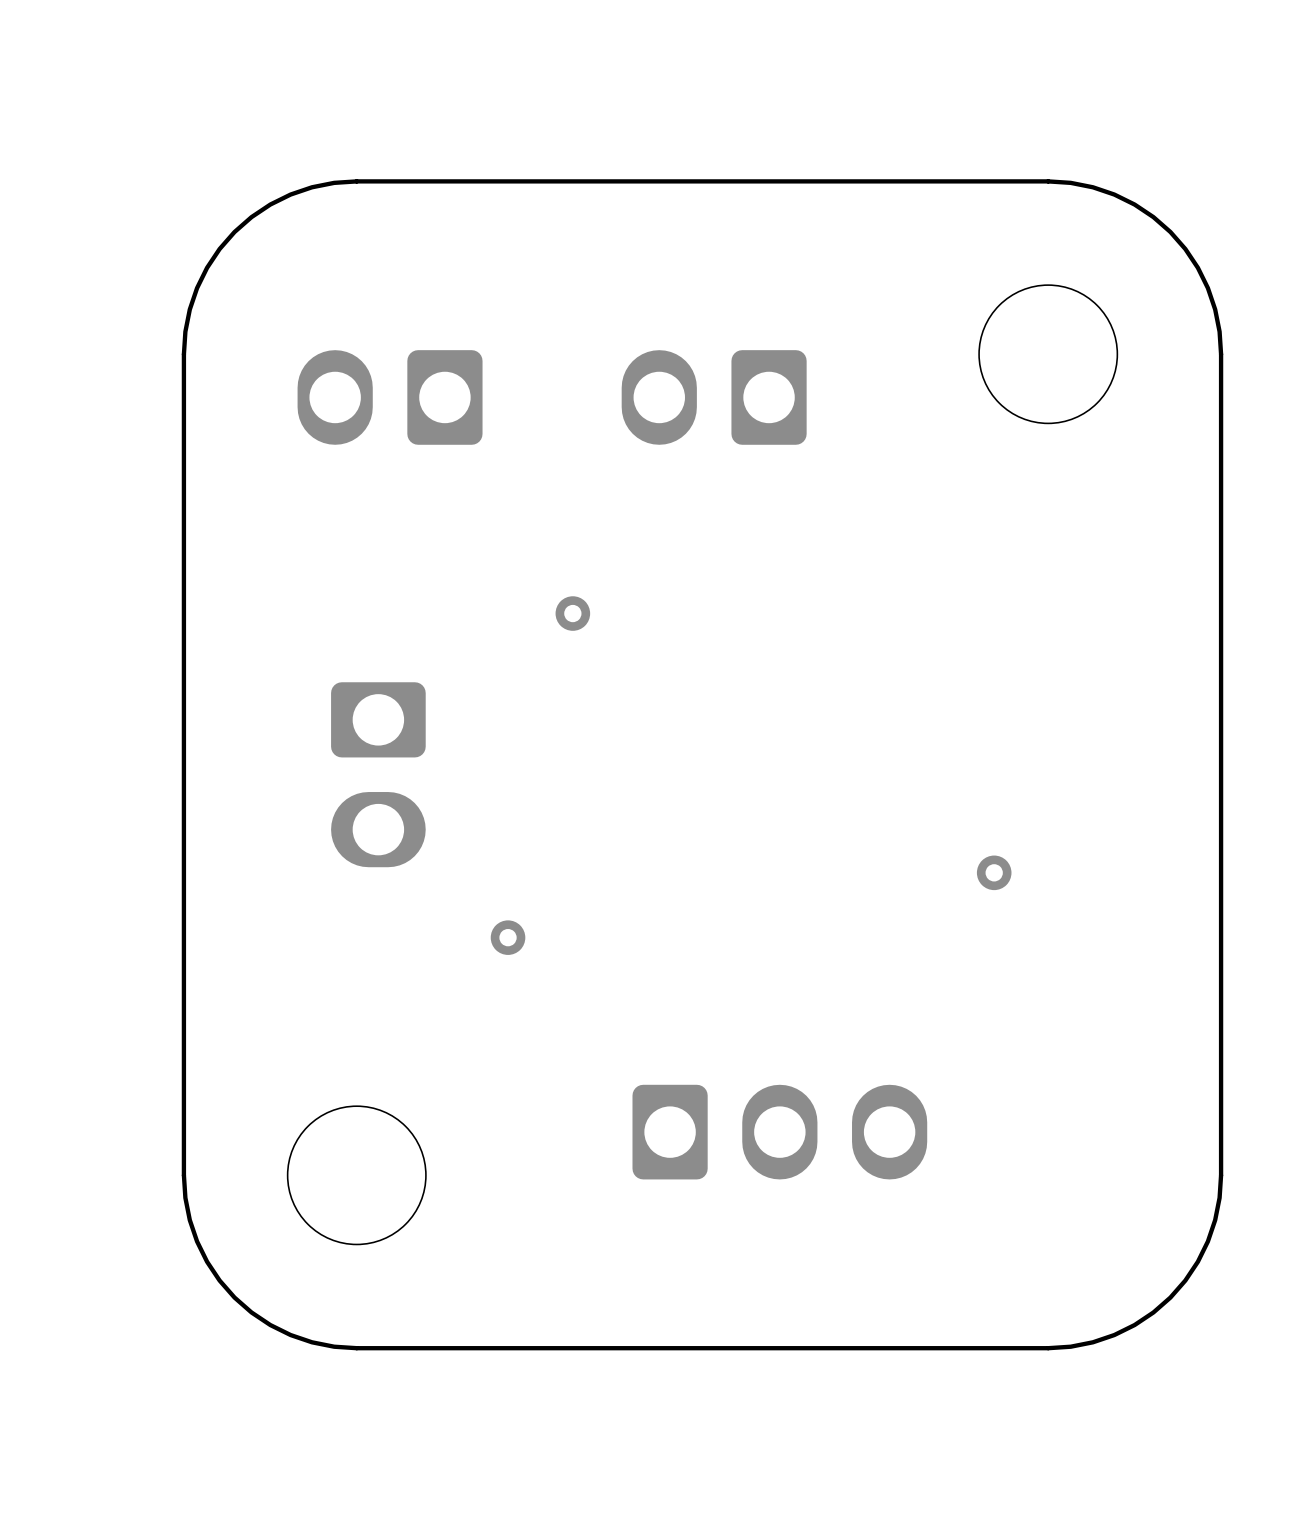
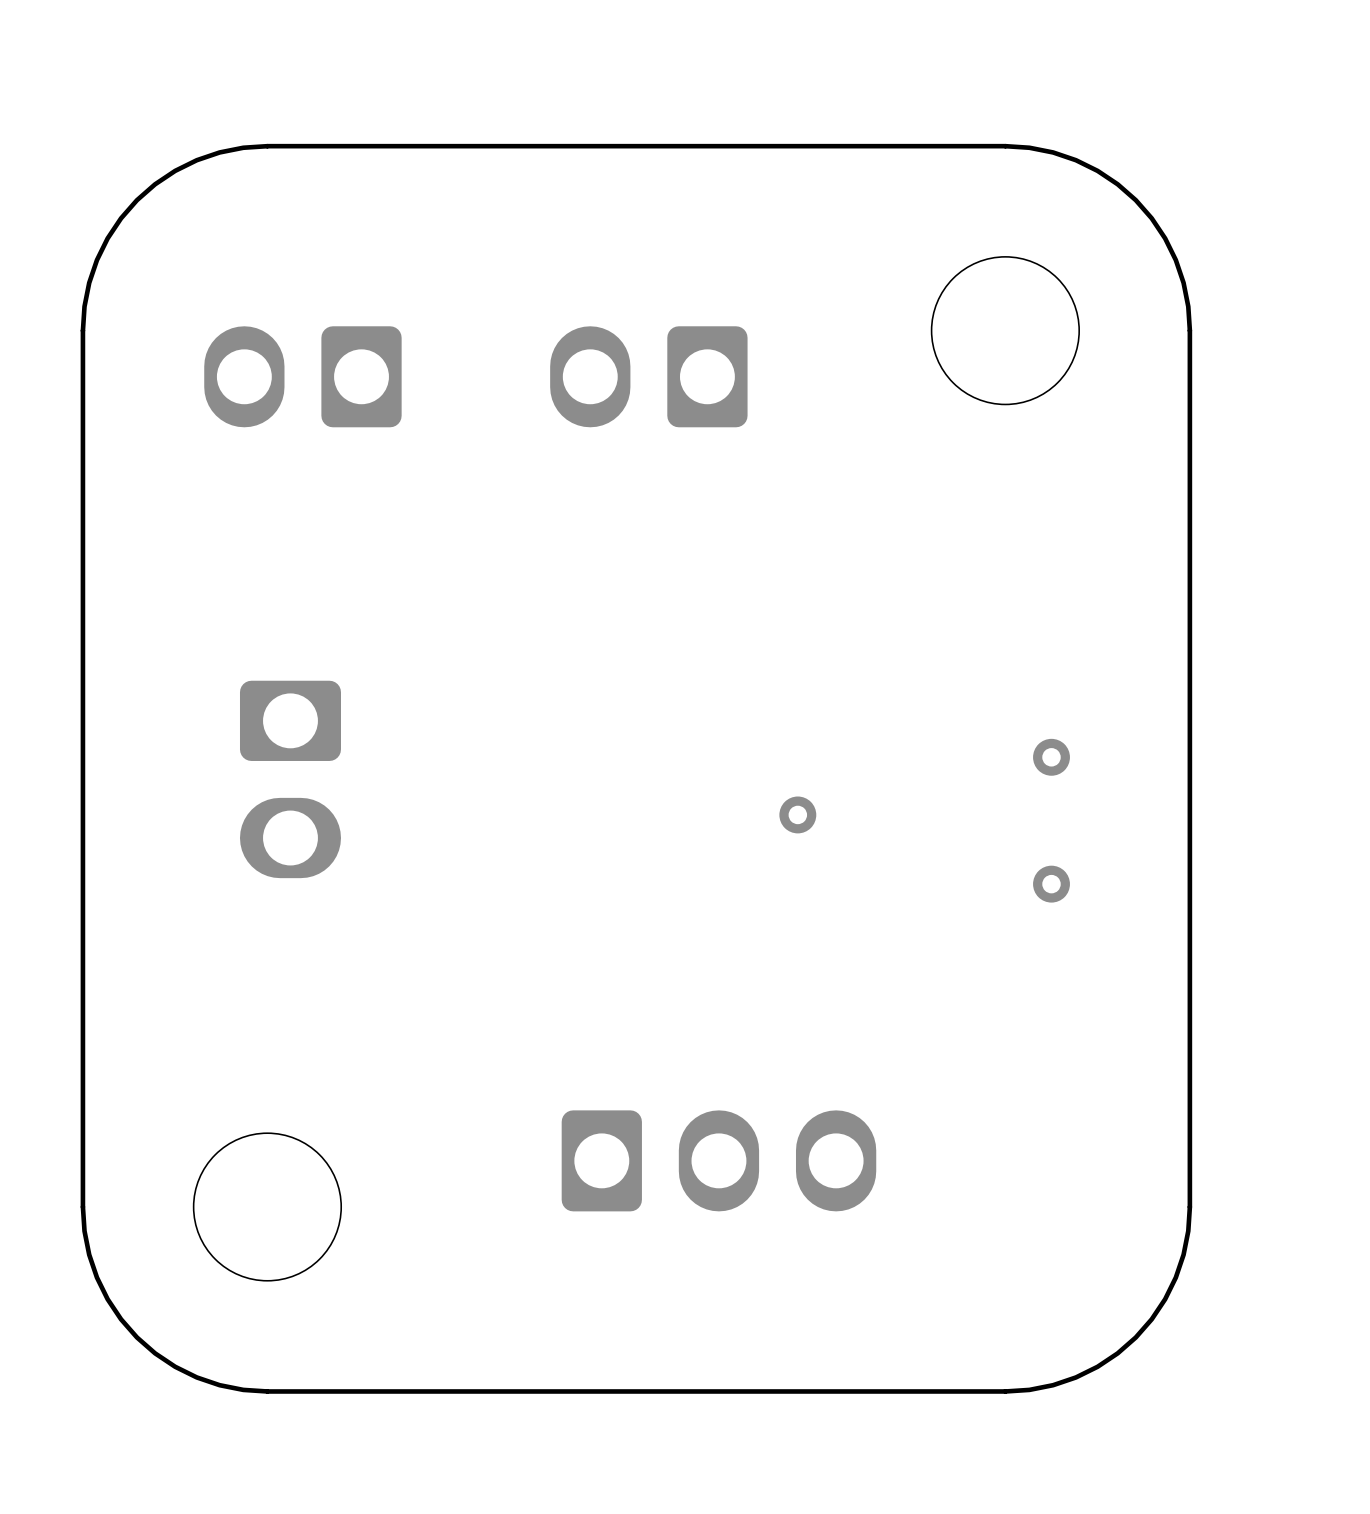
via: (572, 613) -> none
via: none -> (1051, 757)
via: none -> (797, 814)
via: (994, 872) -> none
via: none -> (1051, 884)
via: (508, 937) -> none

